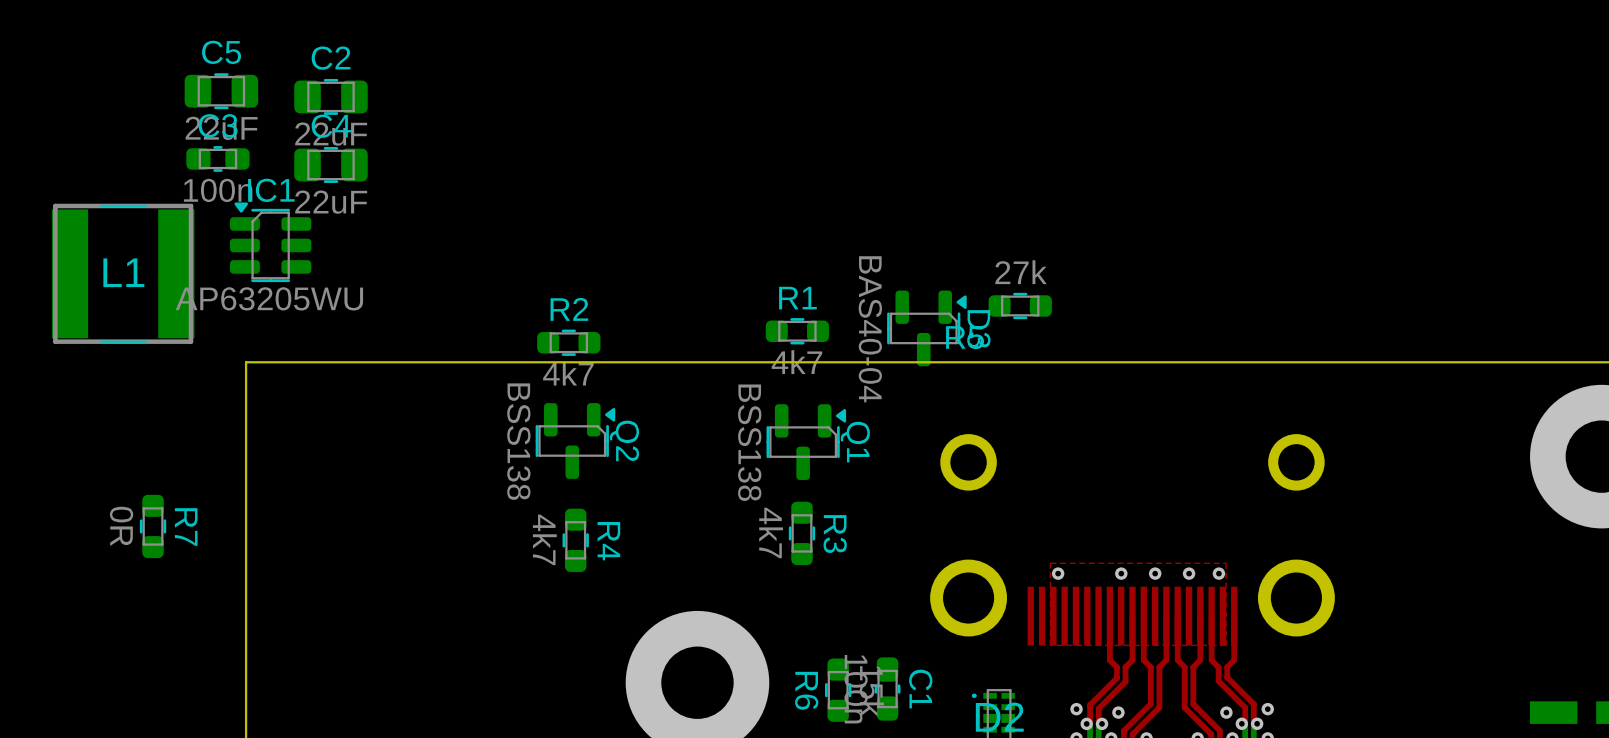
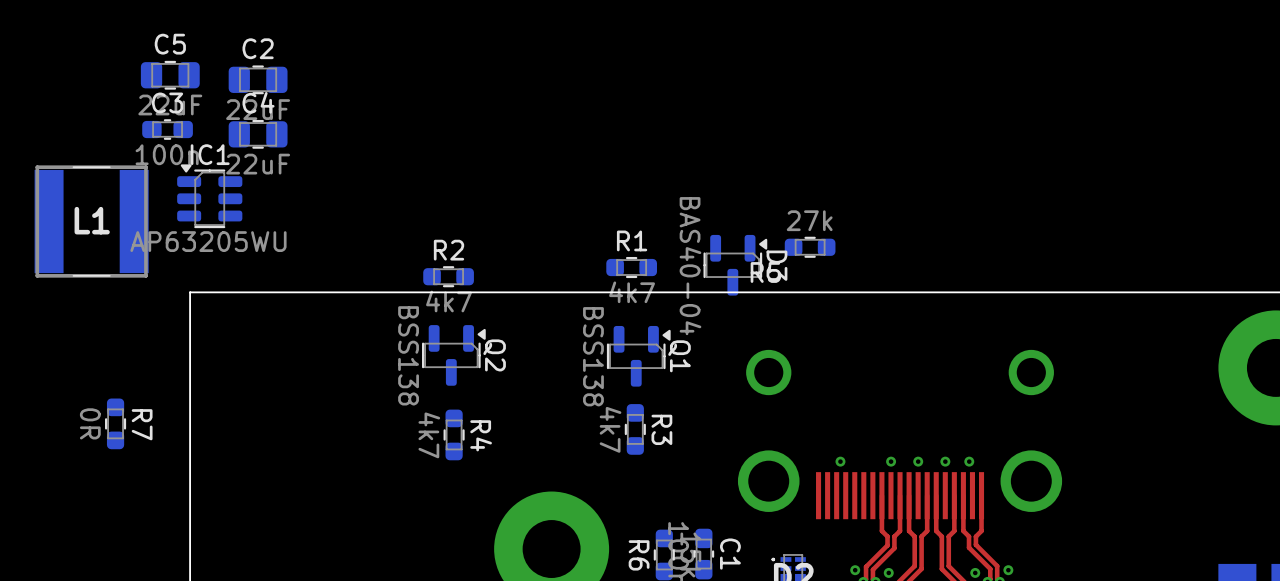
top zone outline: (1226, 563) (1050, 563) (1050, 645) (1226, 645) (1226, 563) -> none

